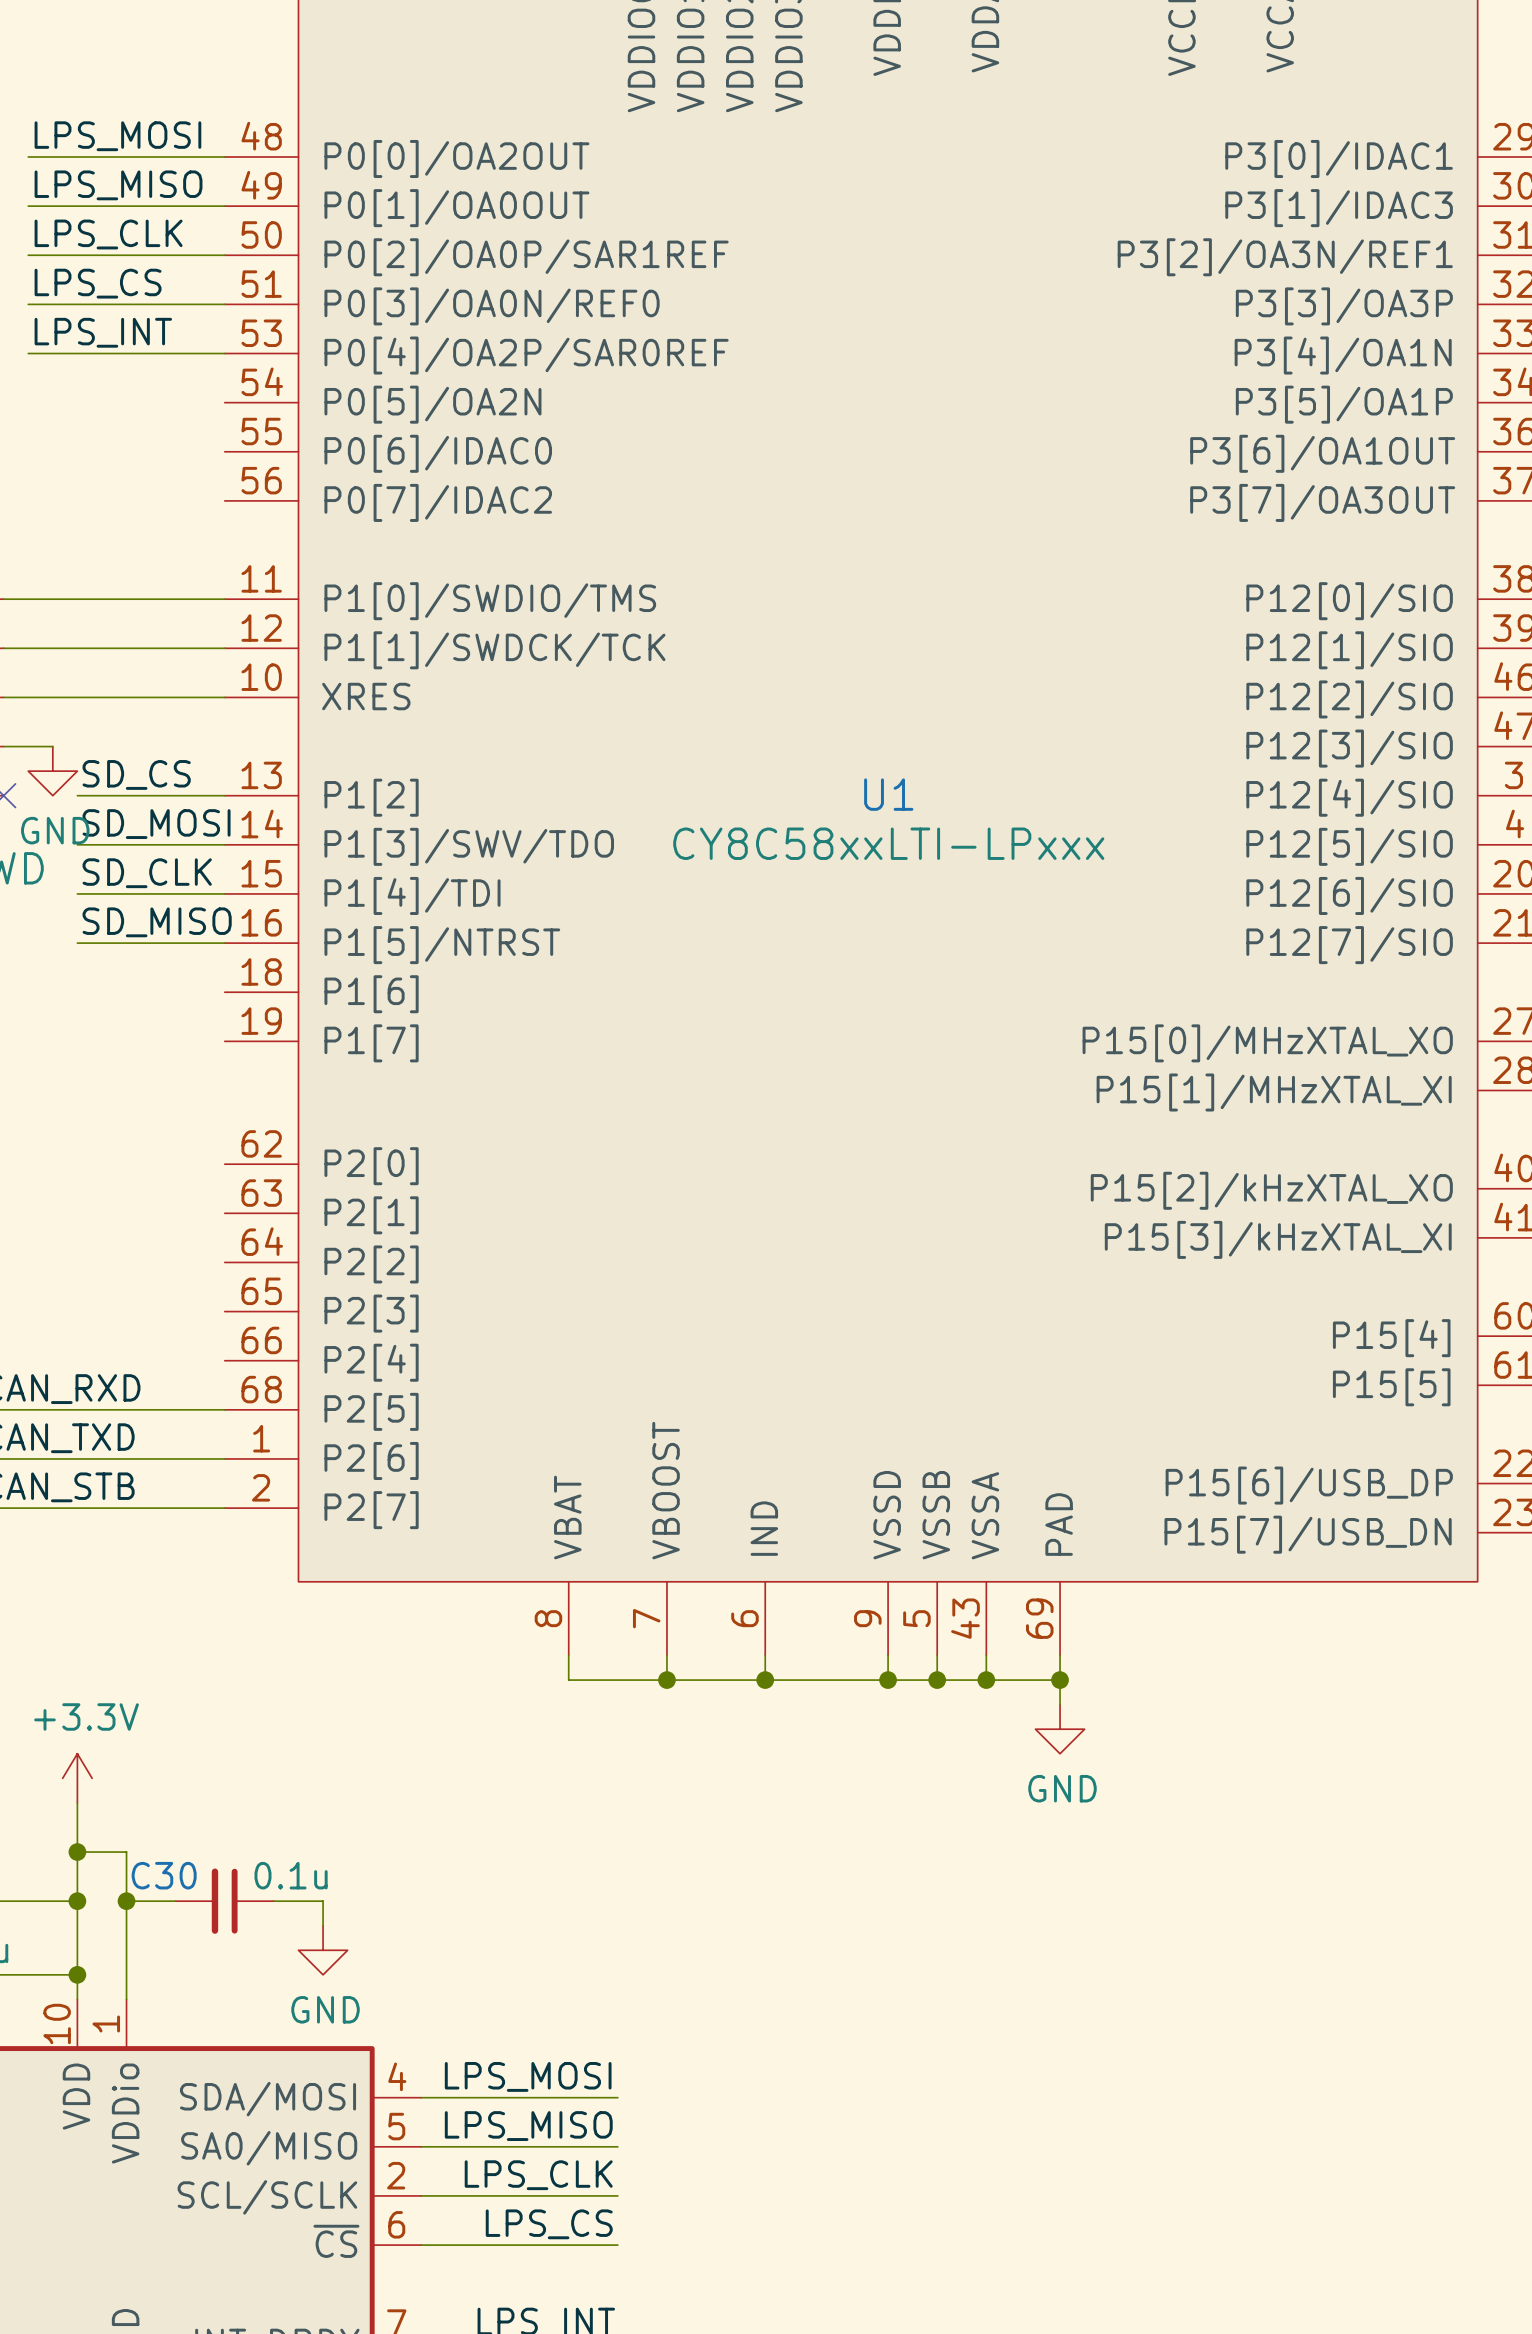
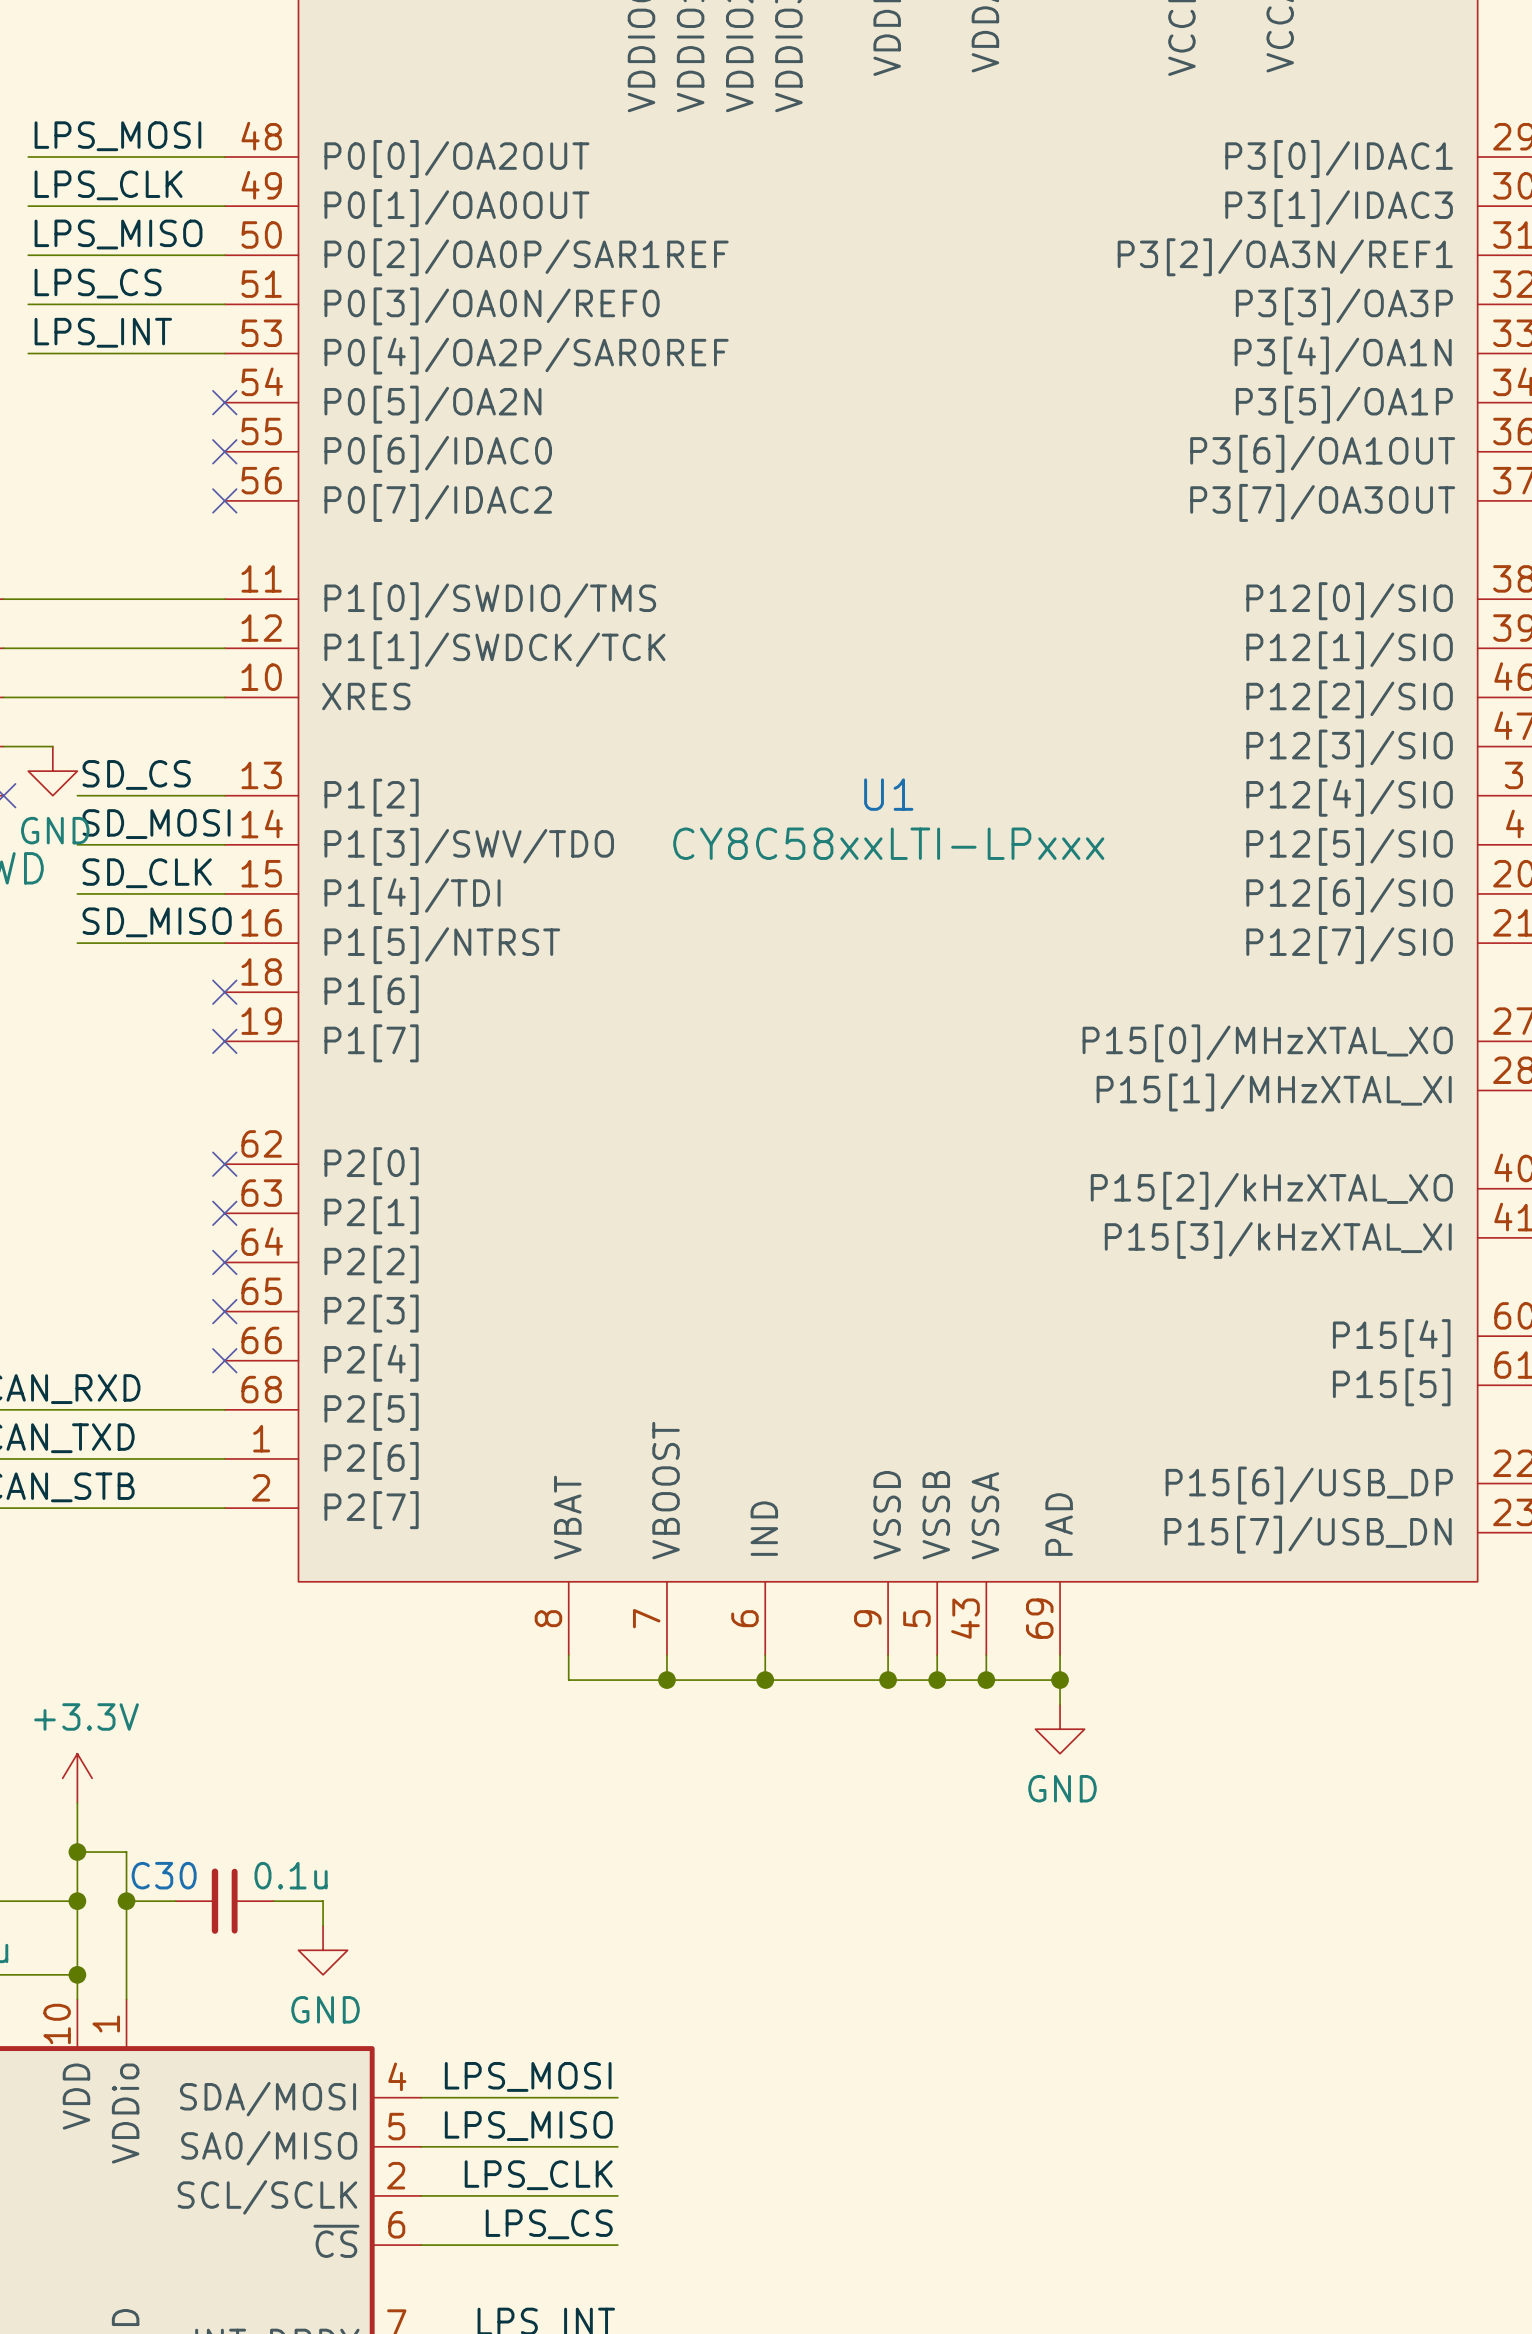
label: LPS_MISO (118, 185) -> LPS_CLK (108, 185)
label: LPS_CLK (108, 234) -> LPS_MISO (118, 234)
no-connect mark: none -> (224, 402)
no-connect mark: none -> (224, 451)
no-connect mark: none -> (224, 500)
no-connect mark: none -> (224, 992)
no-connect mark: none -> (224, 1041)
no-connect mark: none -> (224, 1164)
no-connect mark: none -> (224, 1213)
no-connect mark: none -> (224, 1262)
no-connect mark: none -> (224, 1311)
no-connect mark: none -> (224, 1360)

